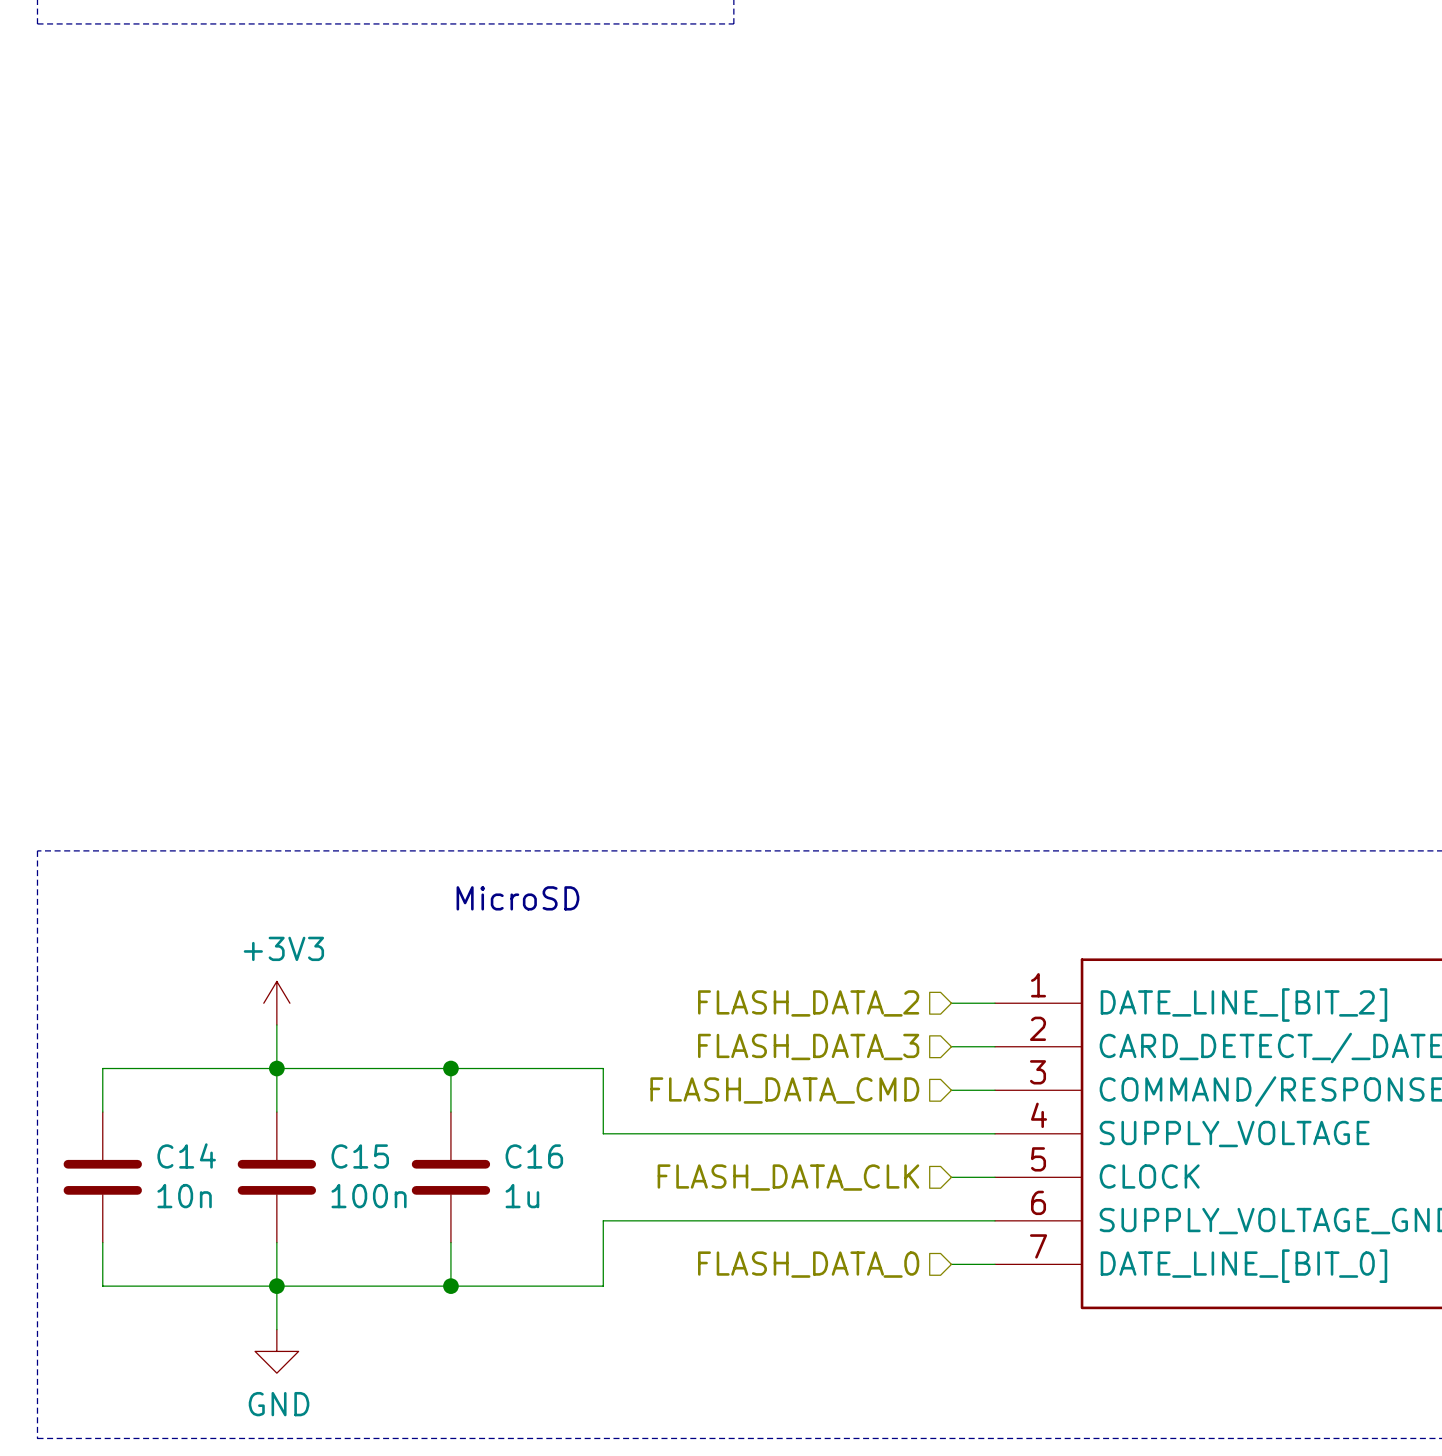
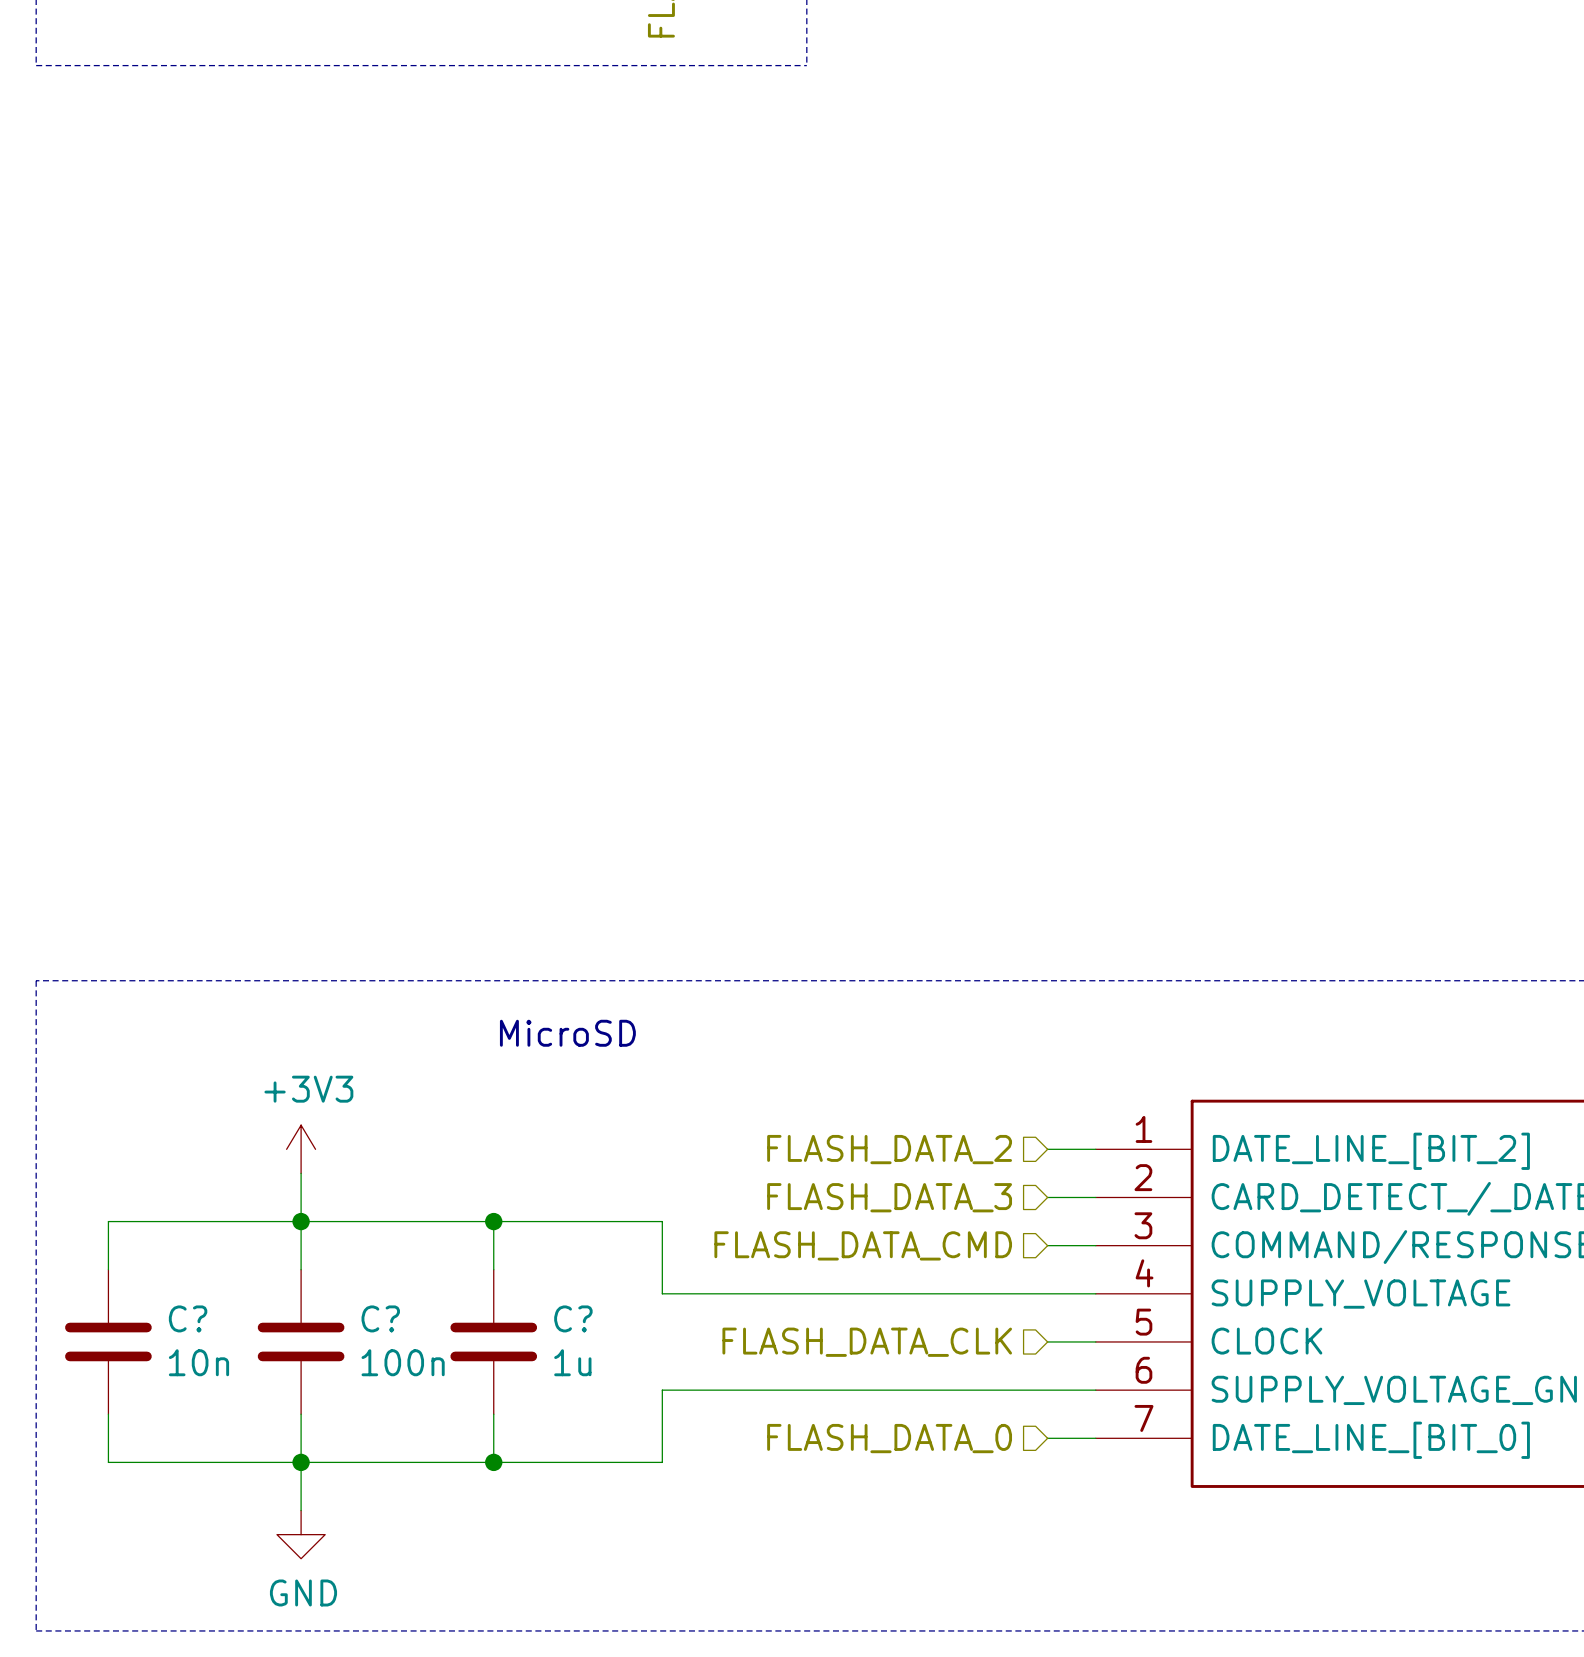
C14 name: C14 (186, 1155) -> C? (188, 1318)
C15 name: C15 (360, 1156) -> C? (380, 1318)
C16 name: C16 (534, 1156) -> C? (573, 1318)

